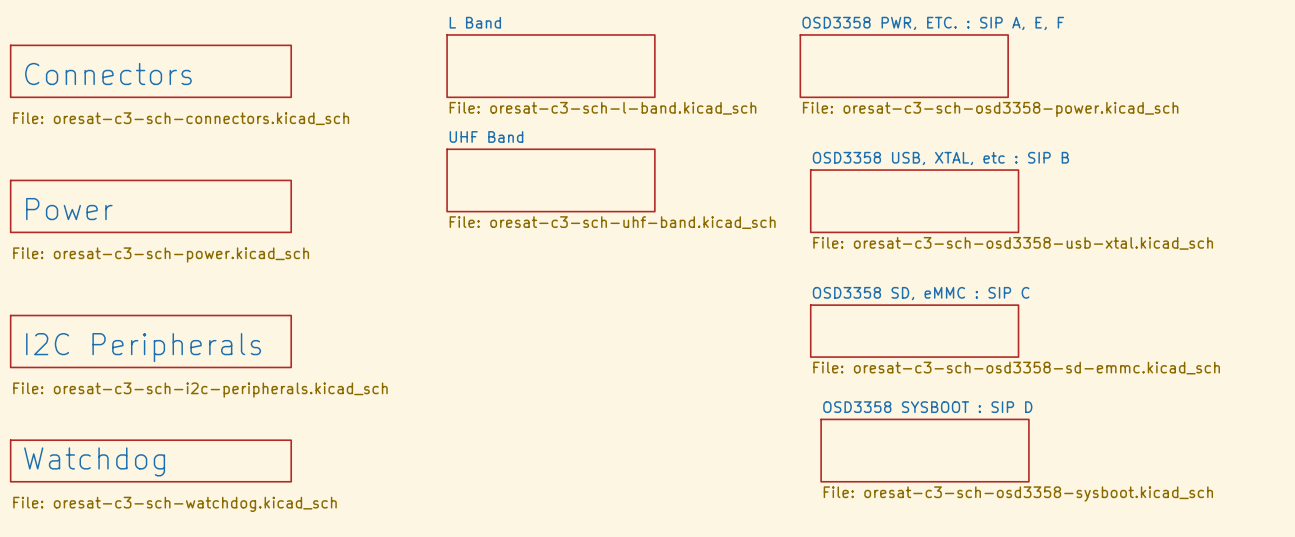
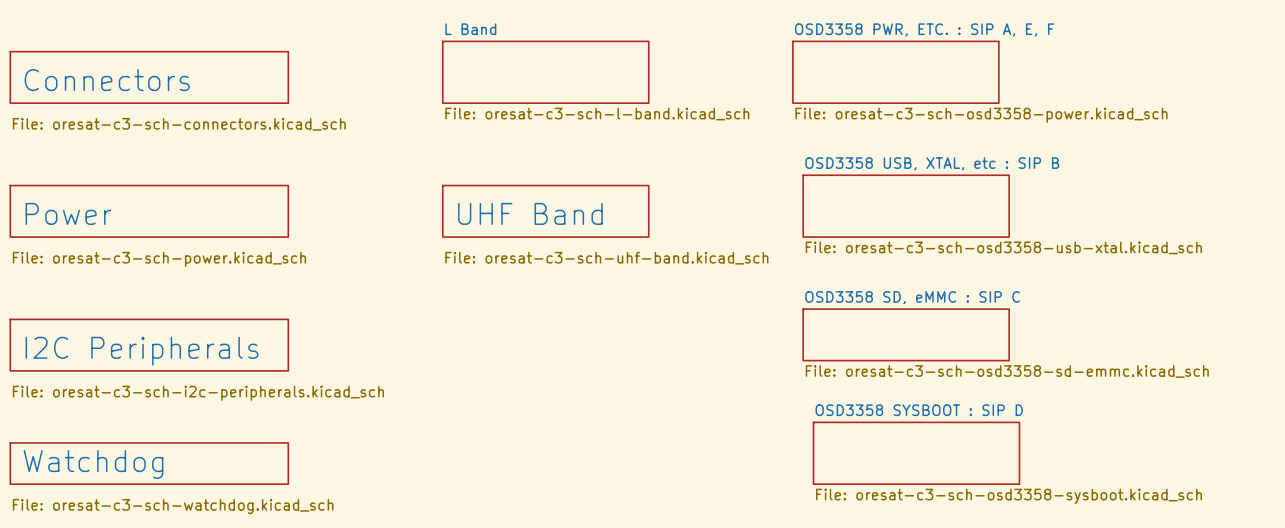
sheet UHF Band: File: oresat-c3-sch-uhf-band.kicad_sch (550, 180) -> none
sheet UHF Band: none -> File: oresat-c3-sch-uhf-band.kicad_sch (545, 211)

